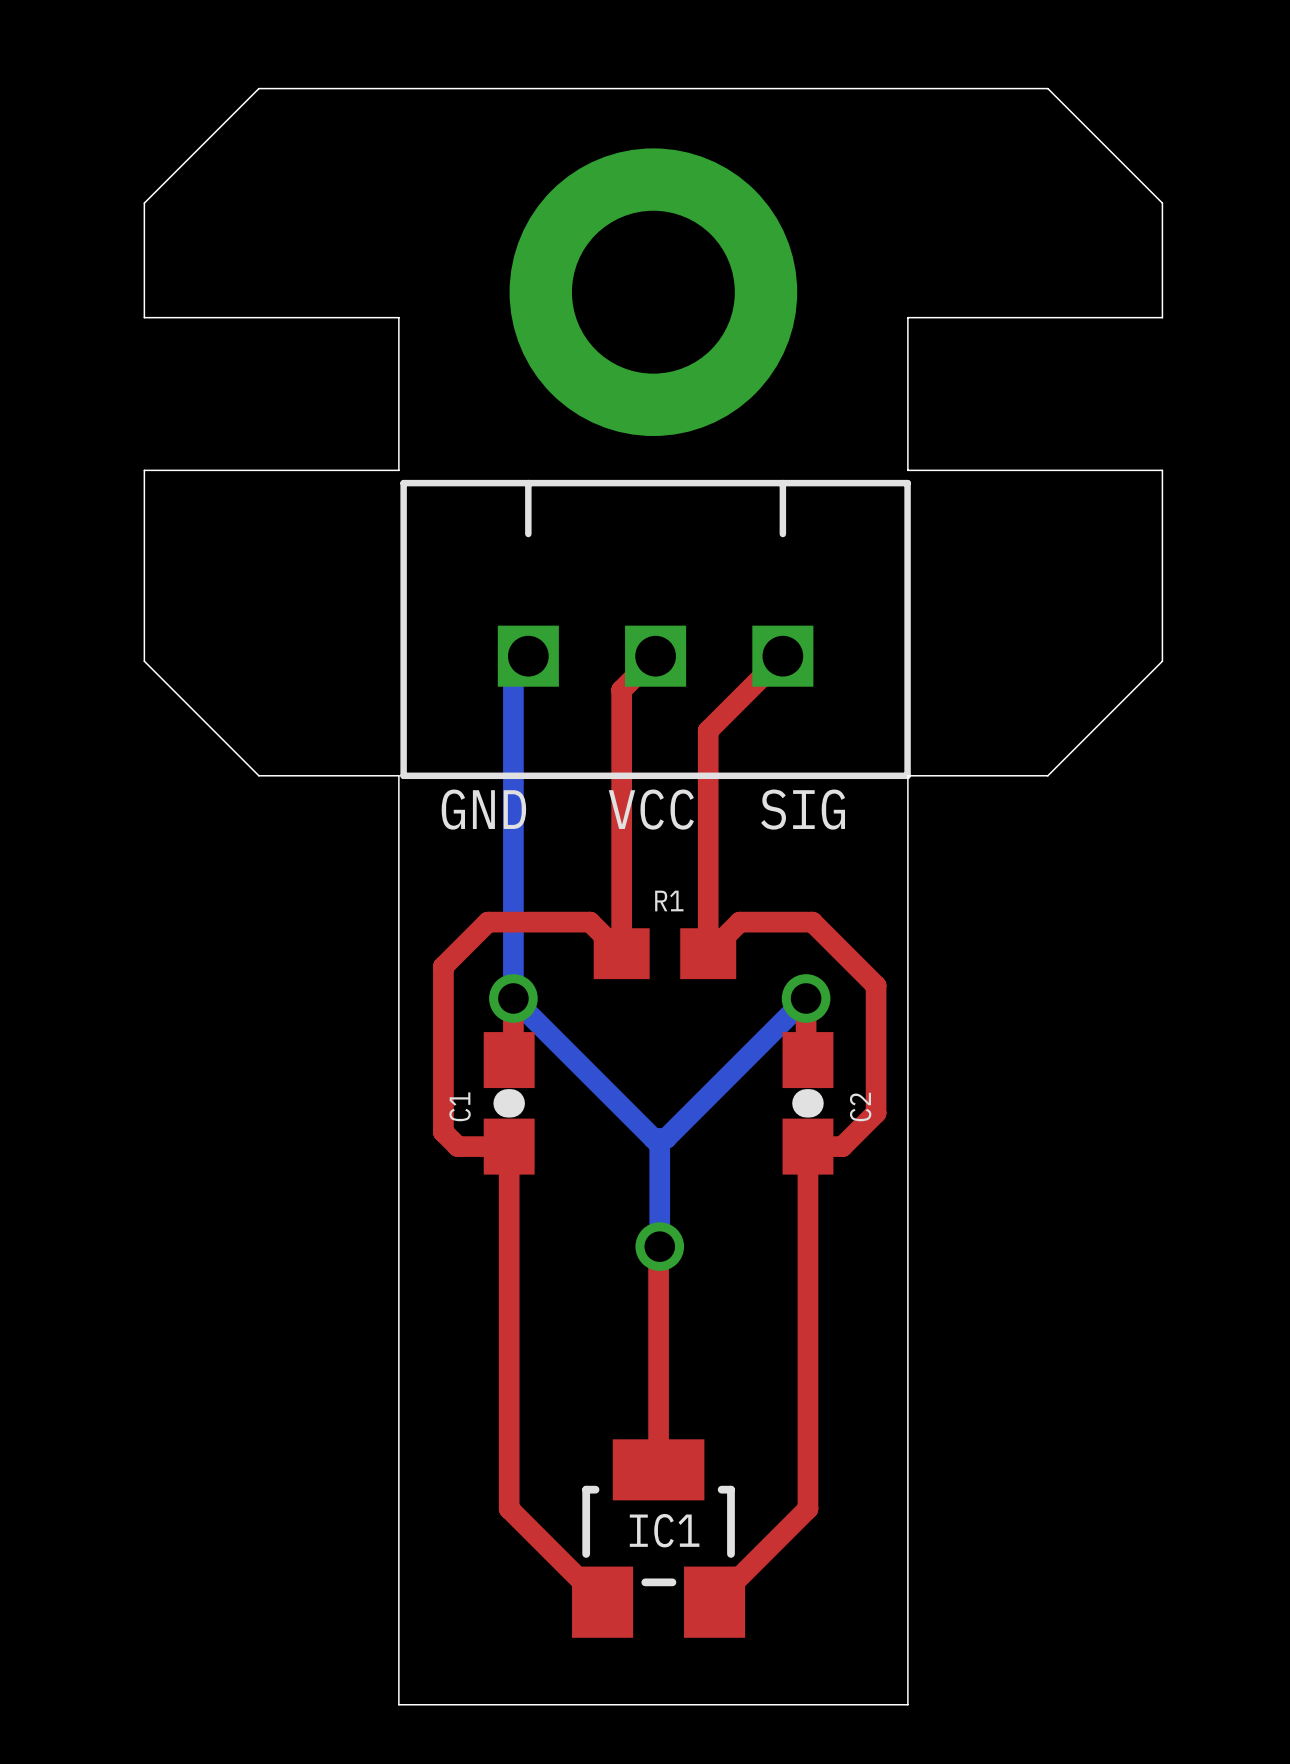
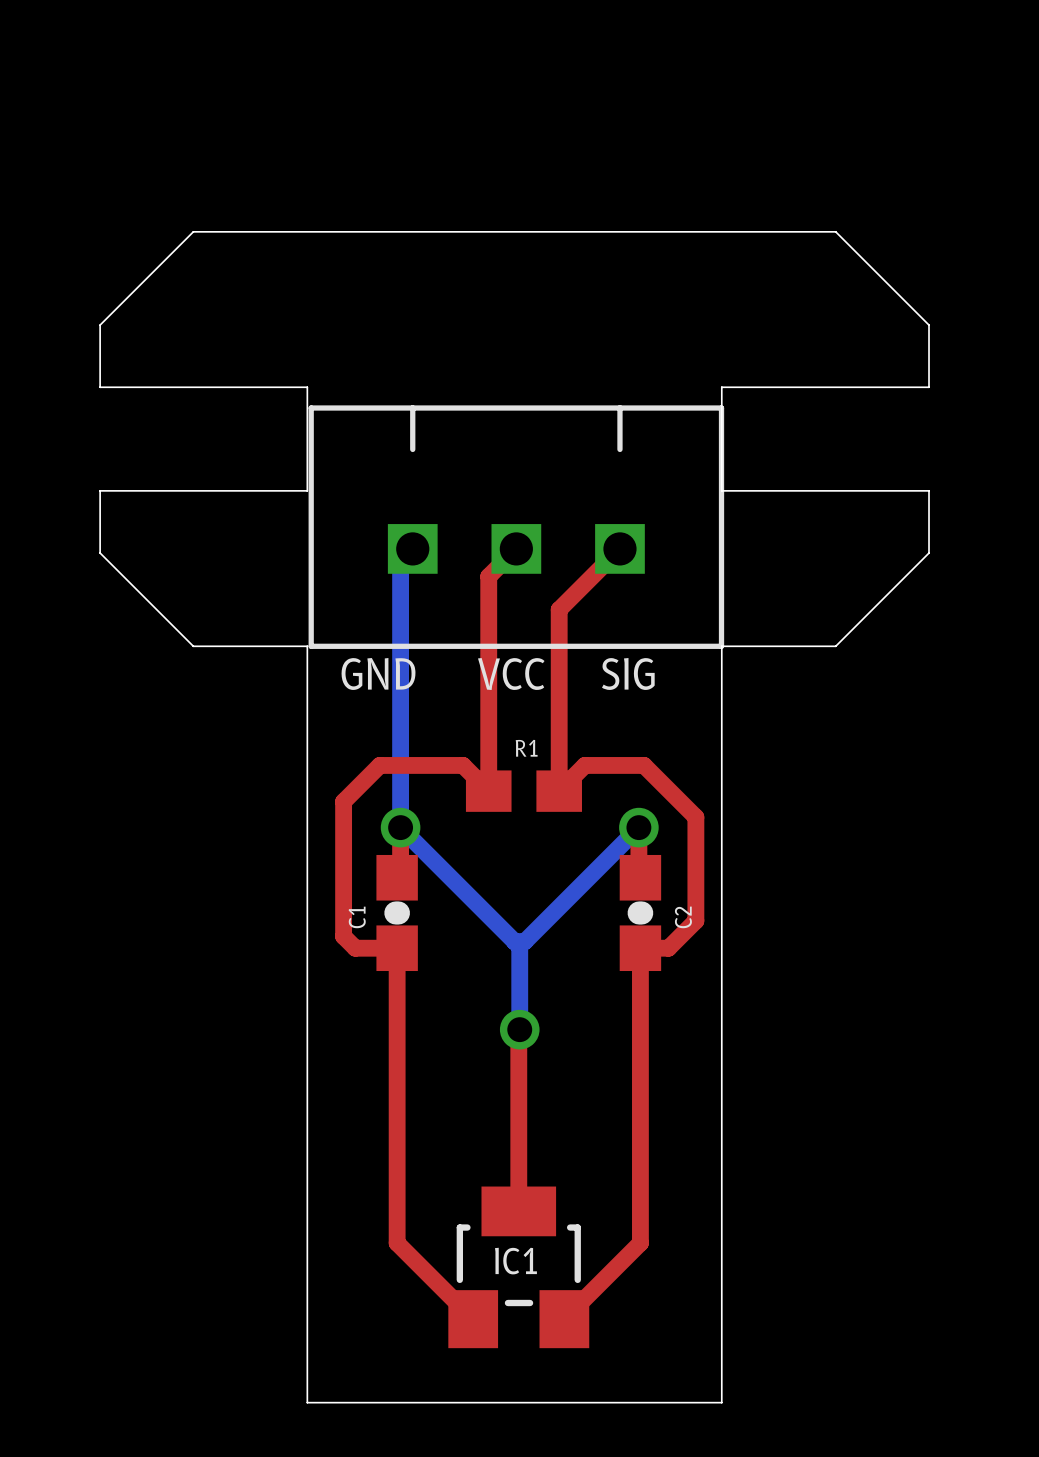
part: (653, 292) -> none
board edge: (398, 457) (398, 317) (144, 317) (144, 203) (258, 88) (1047, 88) (1162, 203) (1162, 317) (907, 317) (907, 457) -> (307, 387) (100, 387) (100, 325) (193, 231) (835, 231) (929, 325) (929, 387) (721, 387)
board edge: (398, 470) (144, 470) (144, 584) -> (307, 397) (307, 490) (100, 490)
board edge: (907, 470) (1162, 470) (1162, 584) -> (721, 397) (721, 490) (929, 490)

